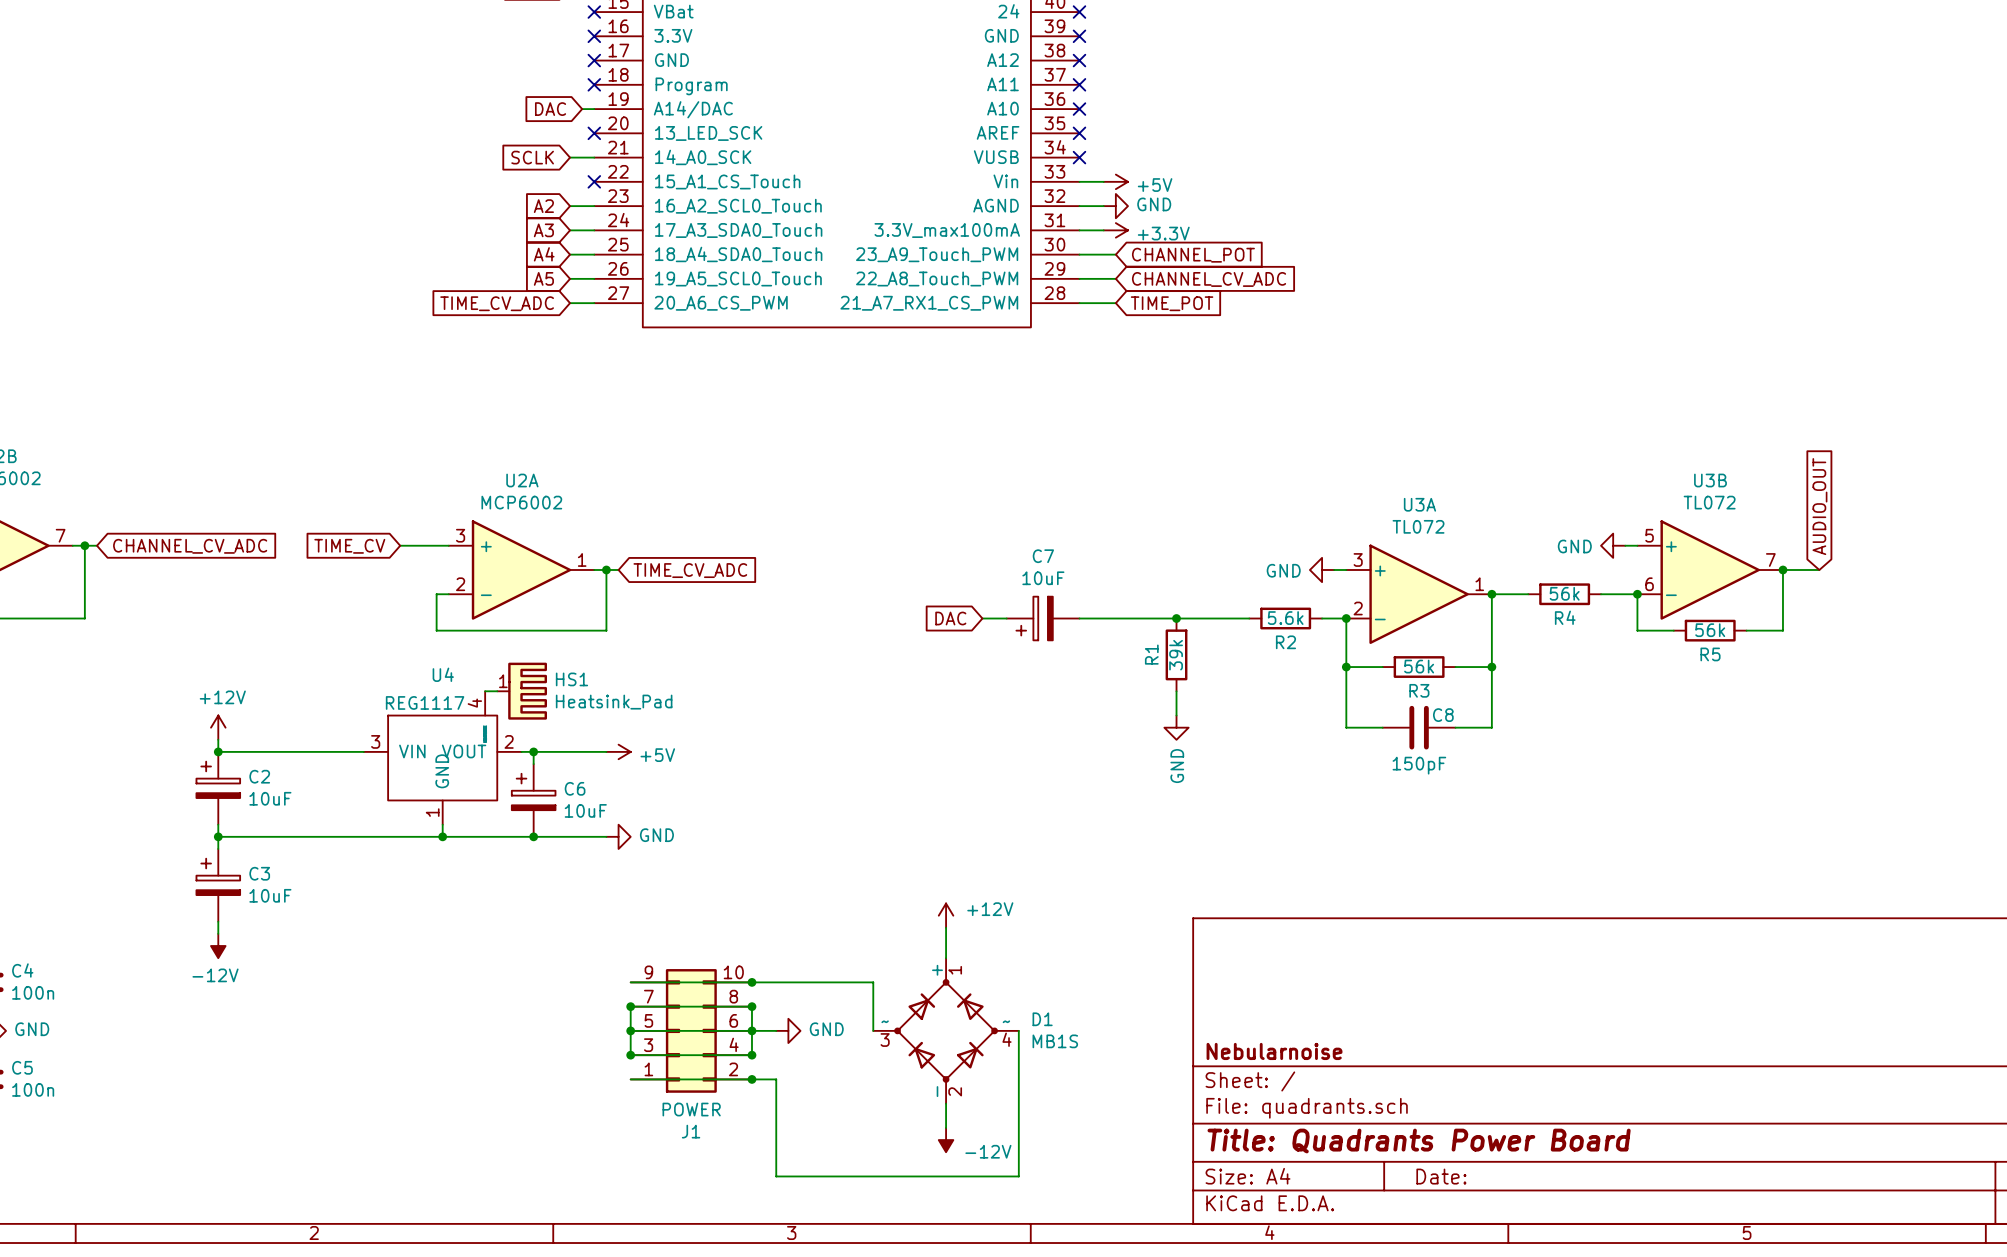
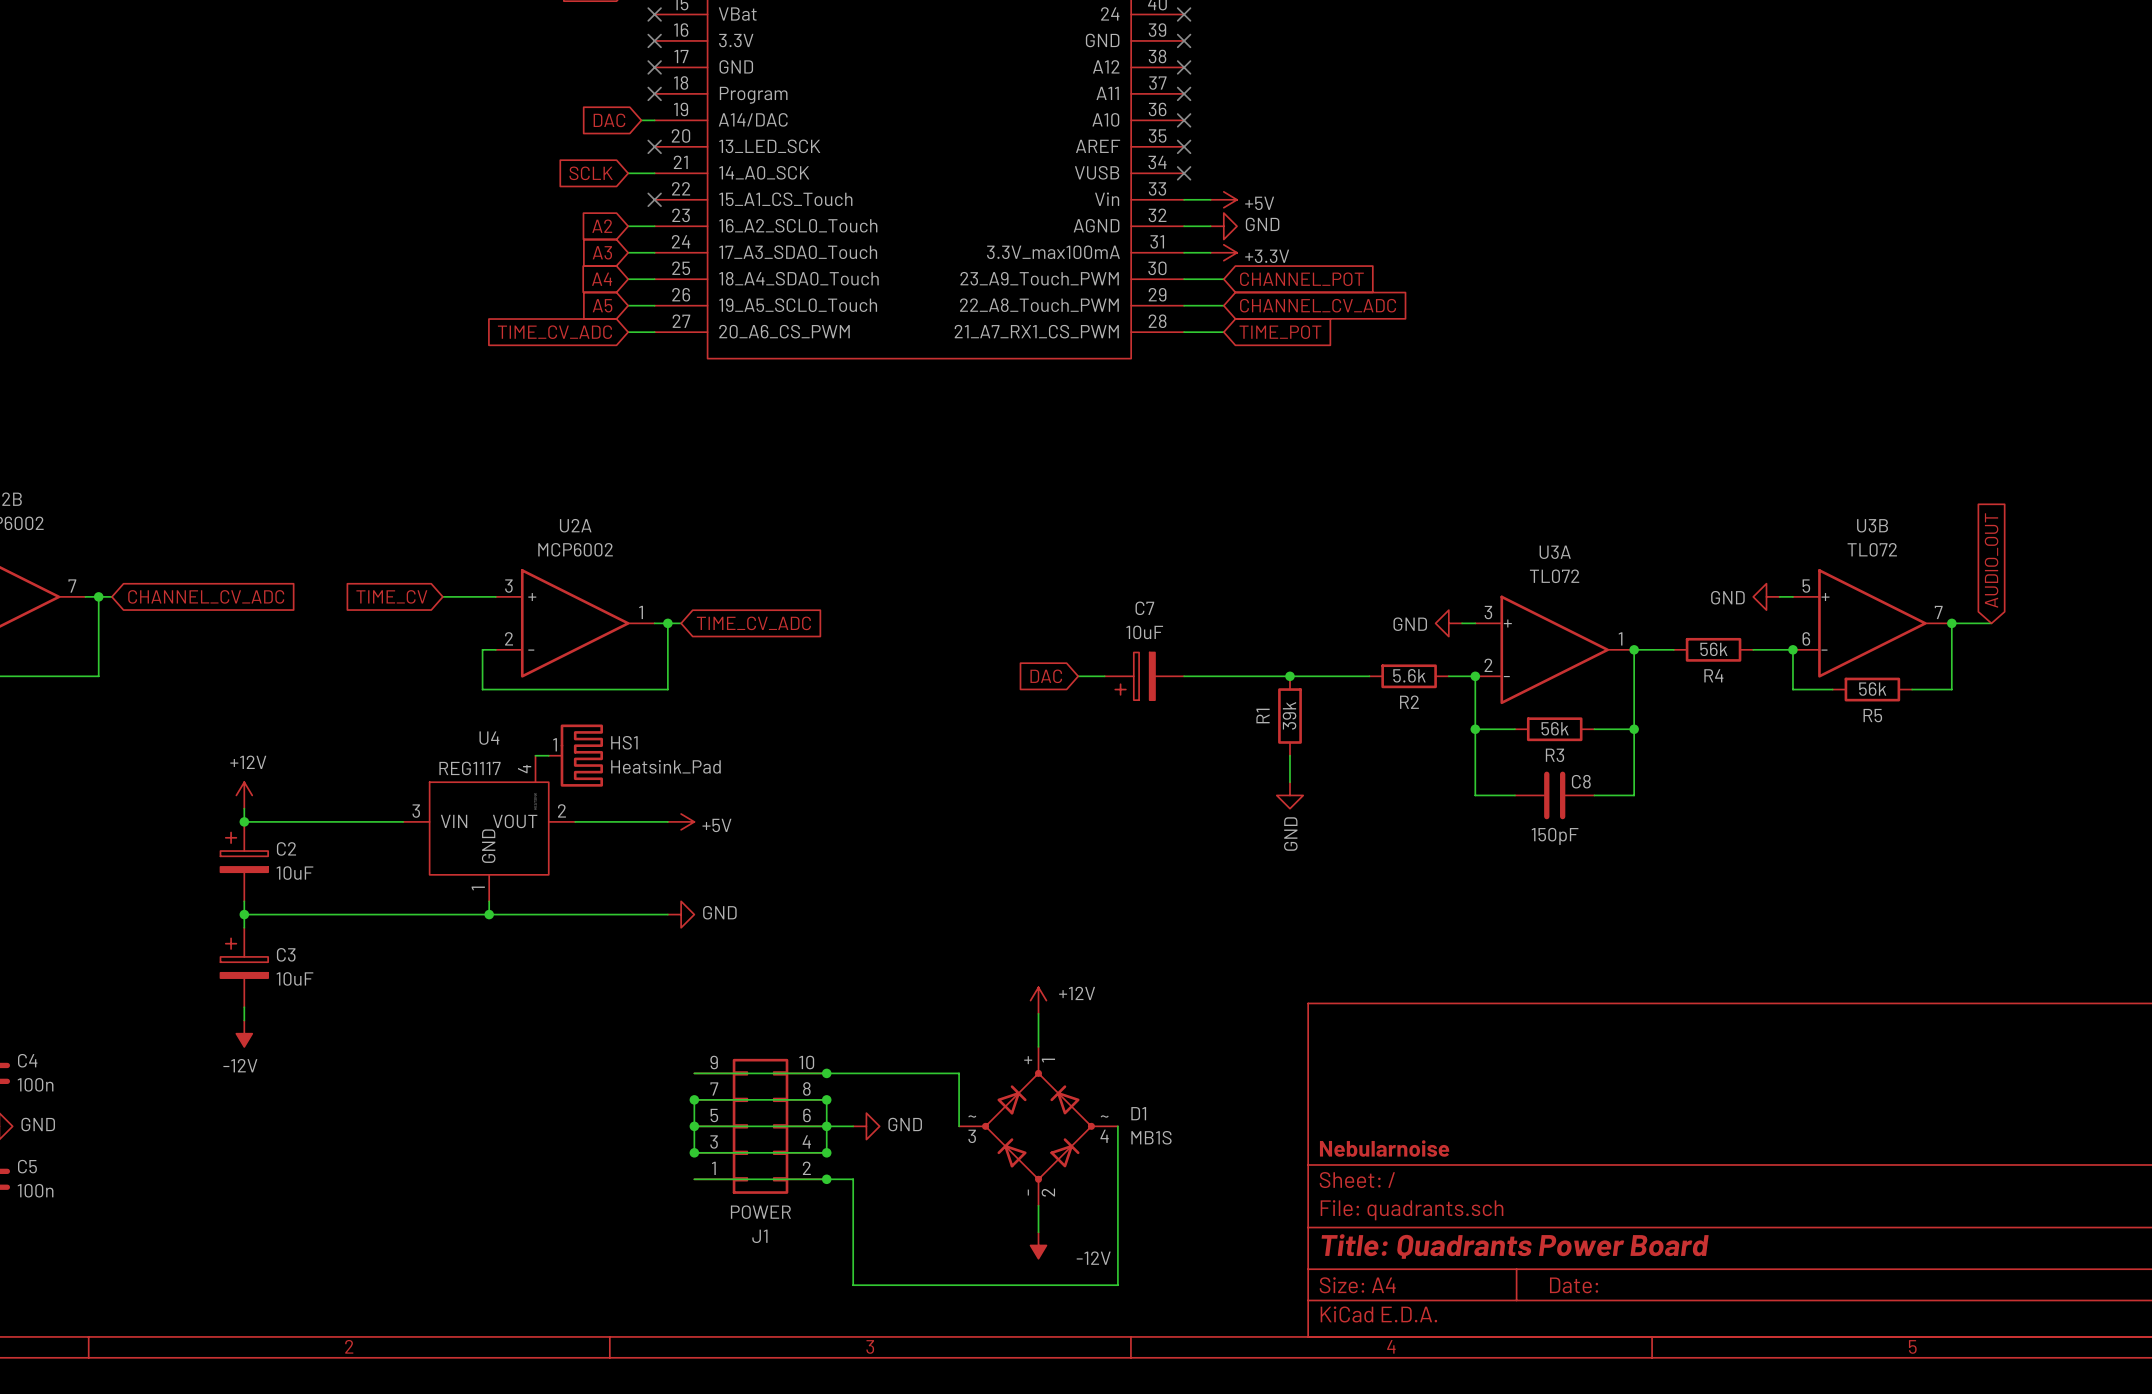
wire: (533, 751) (533, 764) -> none
junction: (533, 751) -> none
C6: 10uF (533, 800) -> none
junction: (533, 836) -> none

